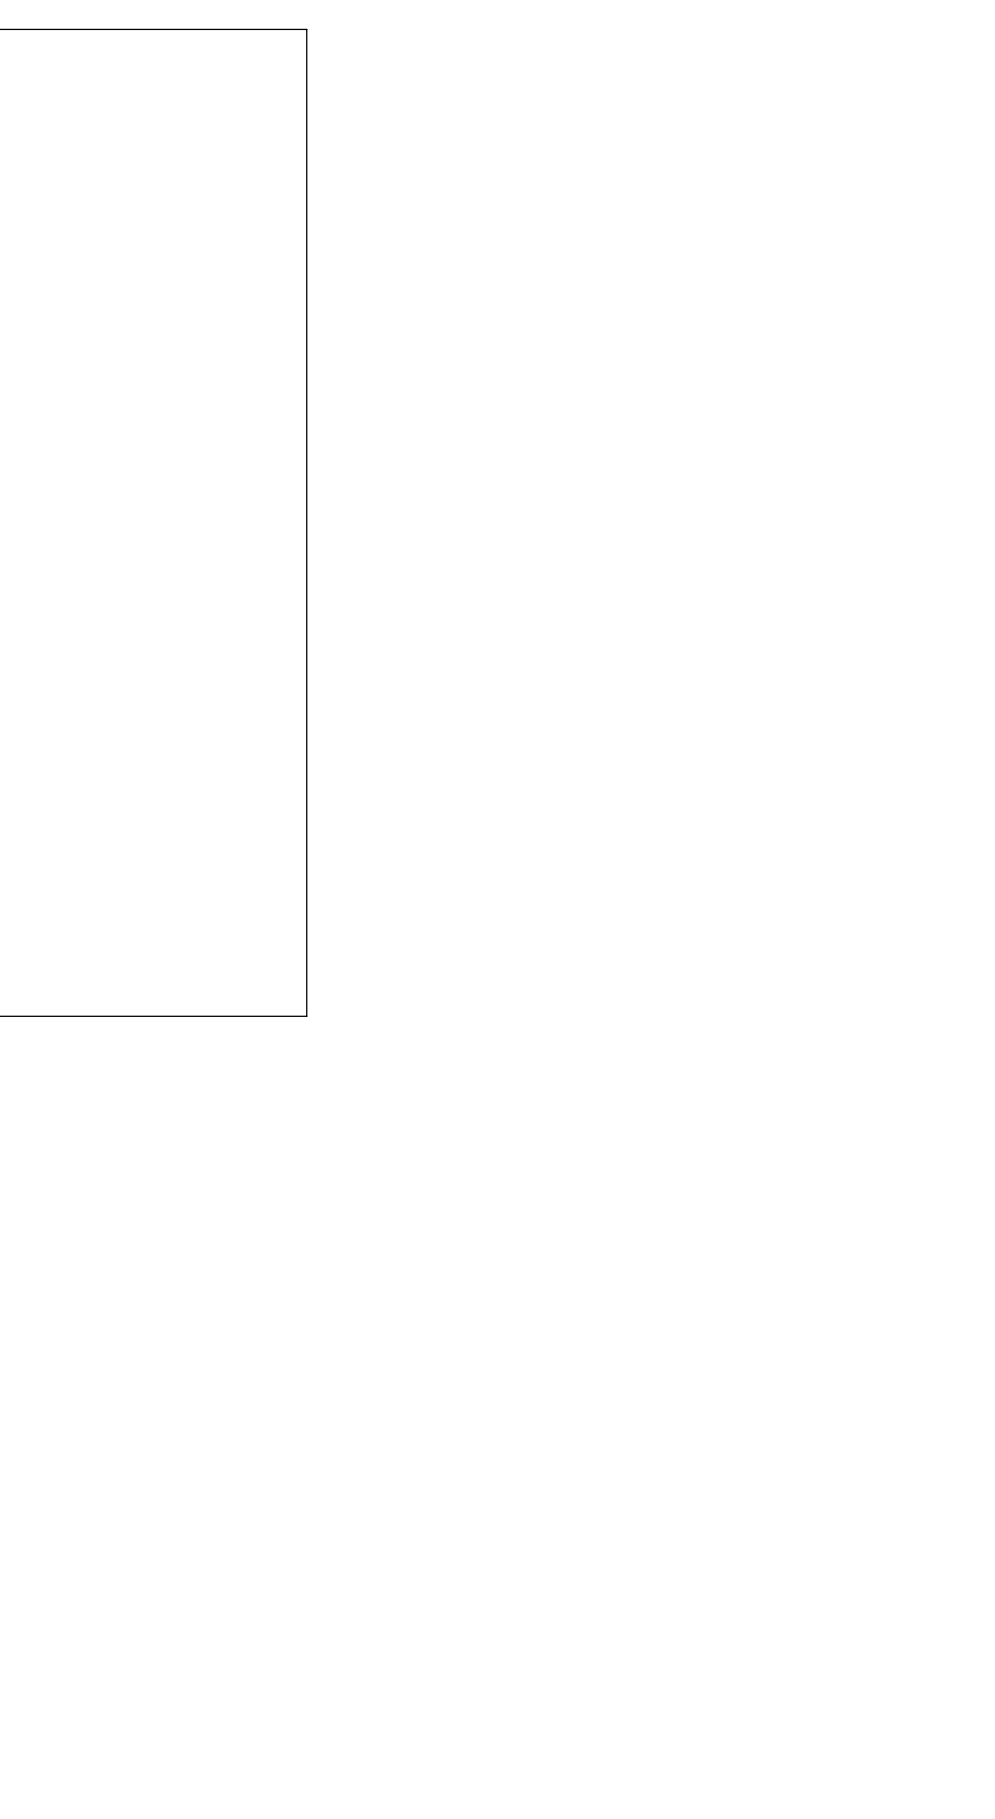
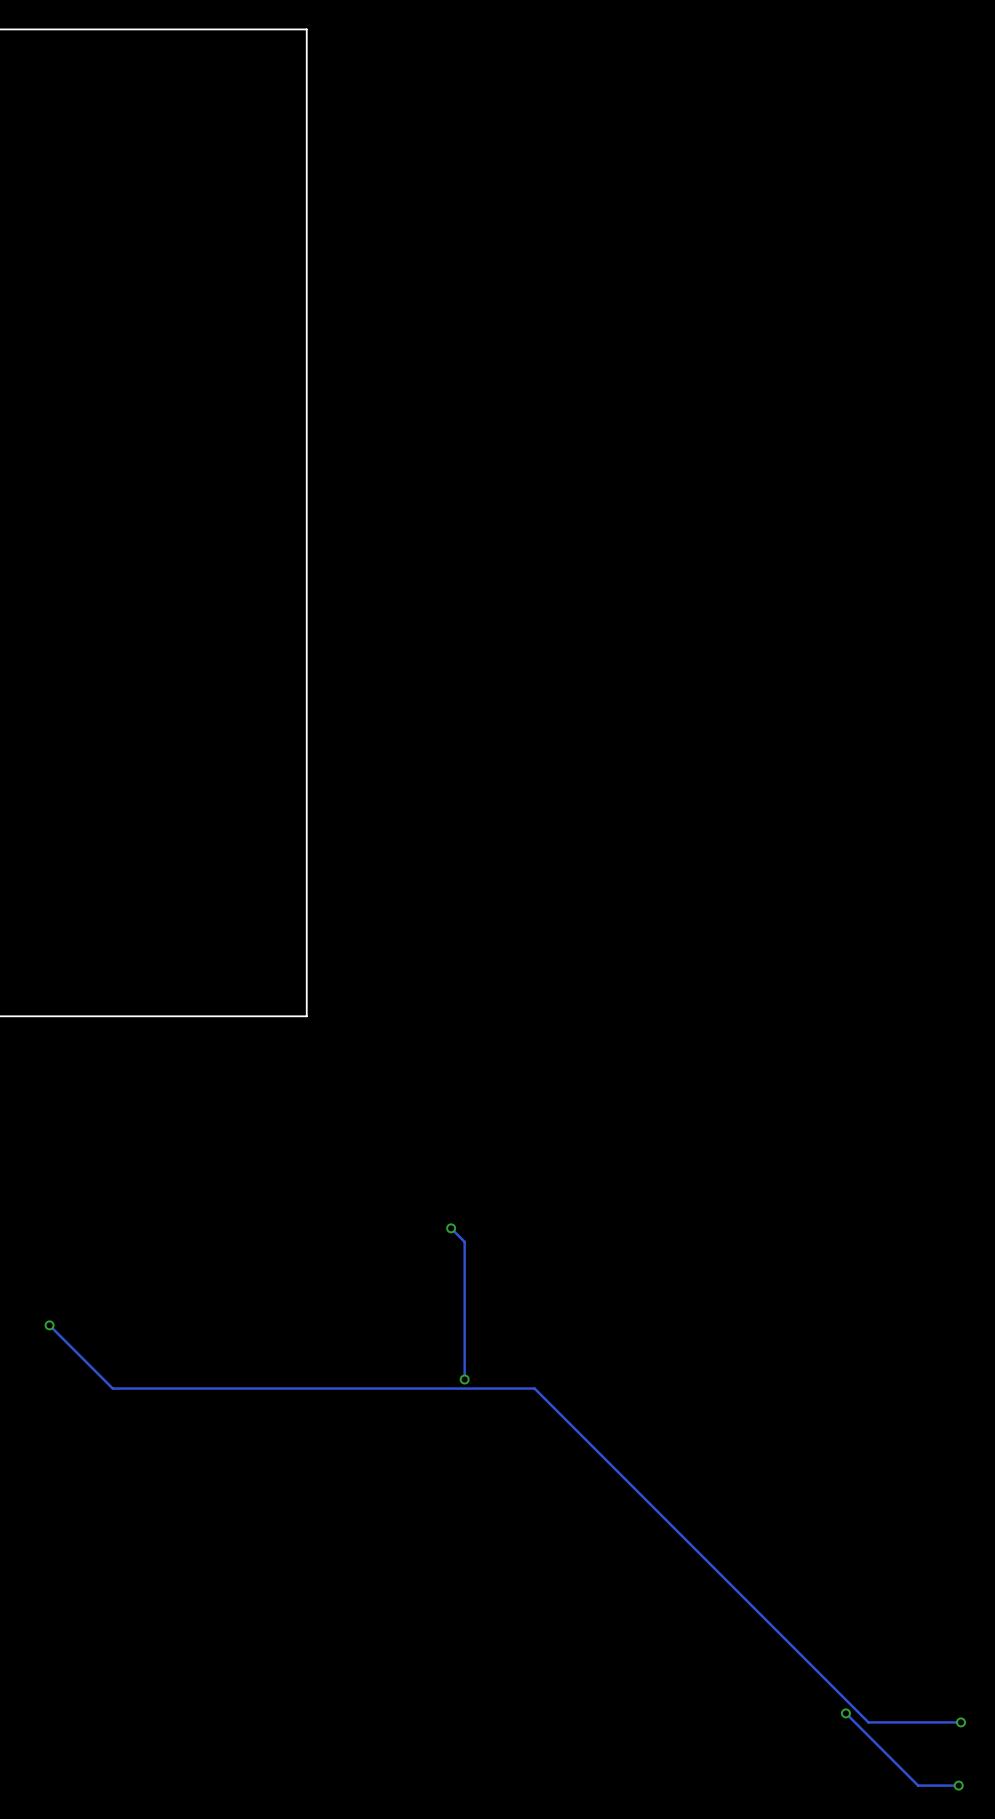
track: none -> (451, 1228) (464, 1241) (464, 1379)
via: none -> (451, 1228)
track: none -> (49, 1325) (112, 1388) (534, 1388) (868, 1722) (960, 1722)
via: none -> (49, 1325)
via: none -> (464, 1379)
track: none -> (845, 1713) (918, 1785) (958, 1785)
via: none -> (845, 1713)
via: none -> (960, 1722)
via: none -> (958, 1785)

